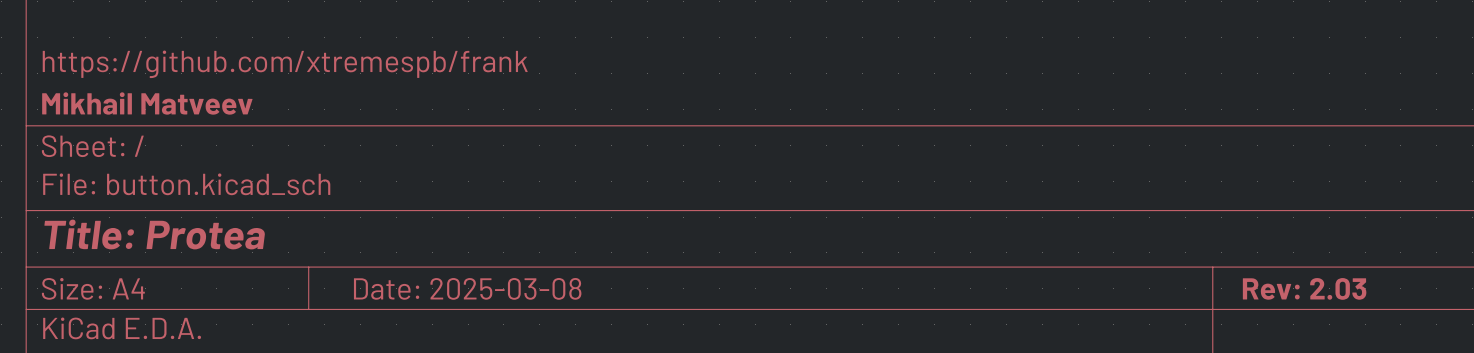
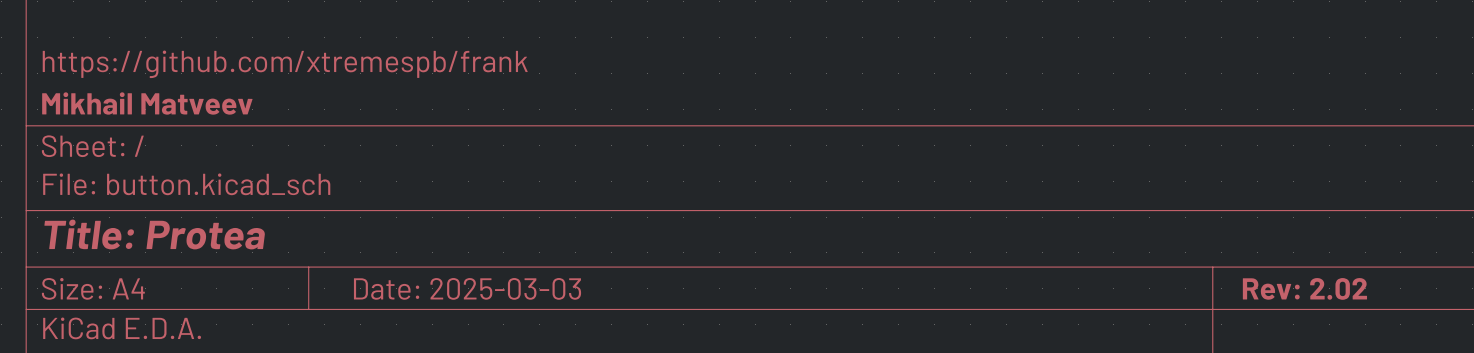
title block: Date: 2025-03-08 (467, 288) -> Date: 2025-03-03 (467, 288)
title block: Rev: 2.03 (1304, 288) -> Rev: 2.02 (1304, 288)

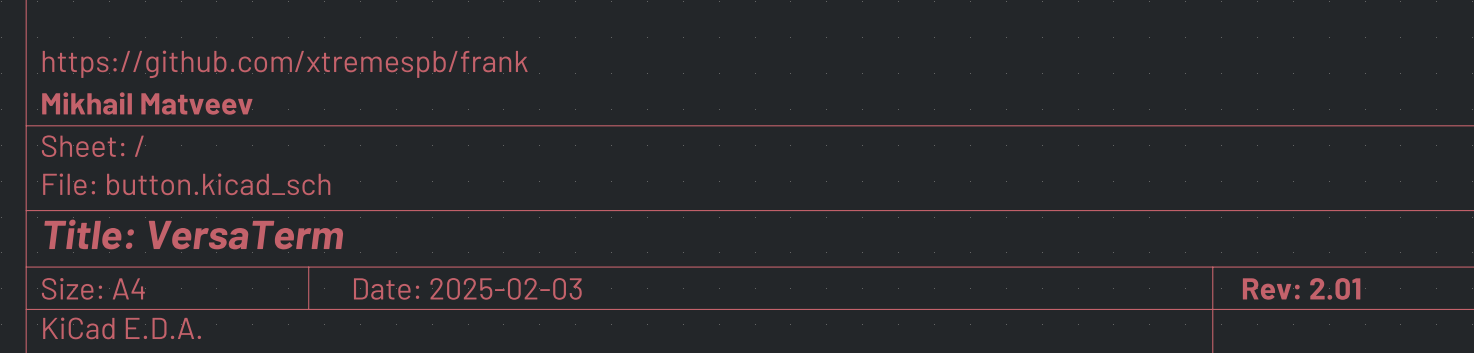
title block: Title: Protea (154, 234) -> Title: VersaTerm (193, 234)
title block: Date: 2025-03-03 (467, 288) -> Date: 2025-02-03 (467, 288)
title block: Rev: 2.02 (1304, 288) -> Rev: 2.01 (1301, 288)

